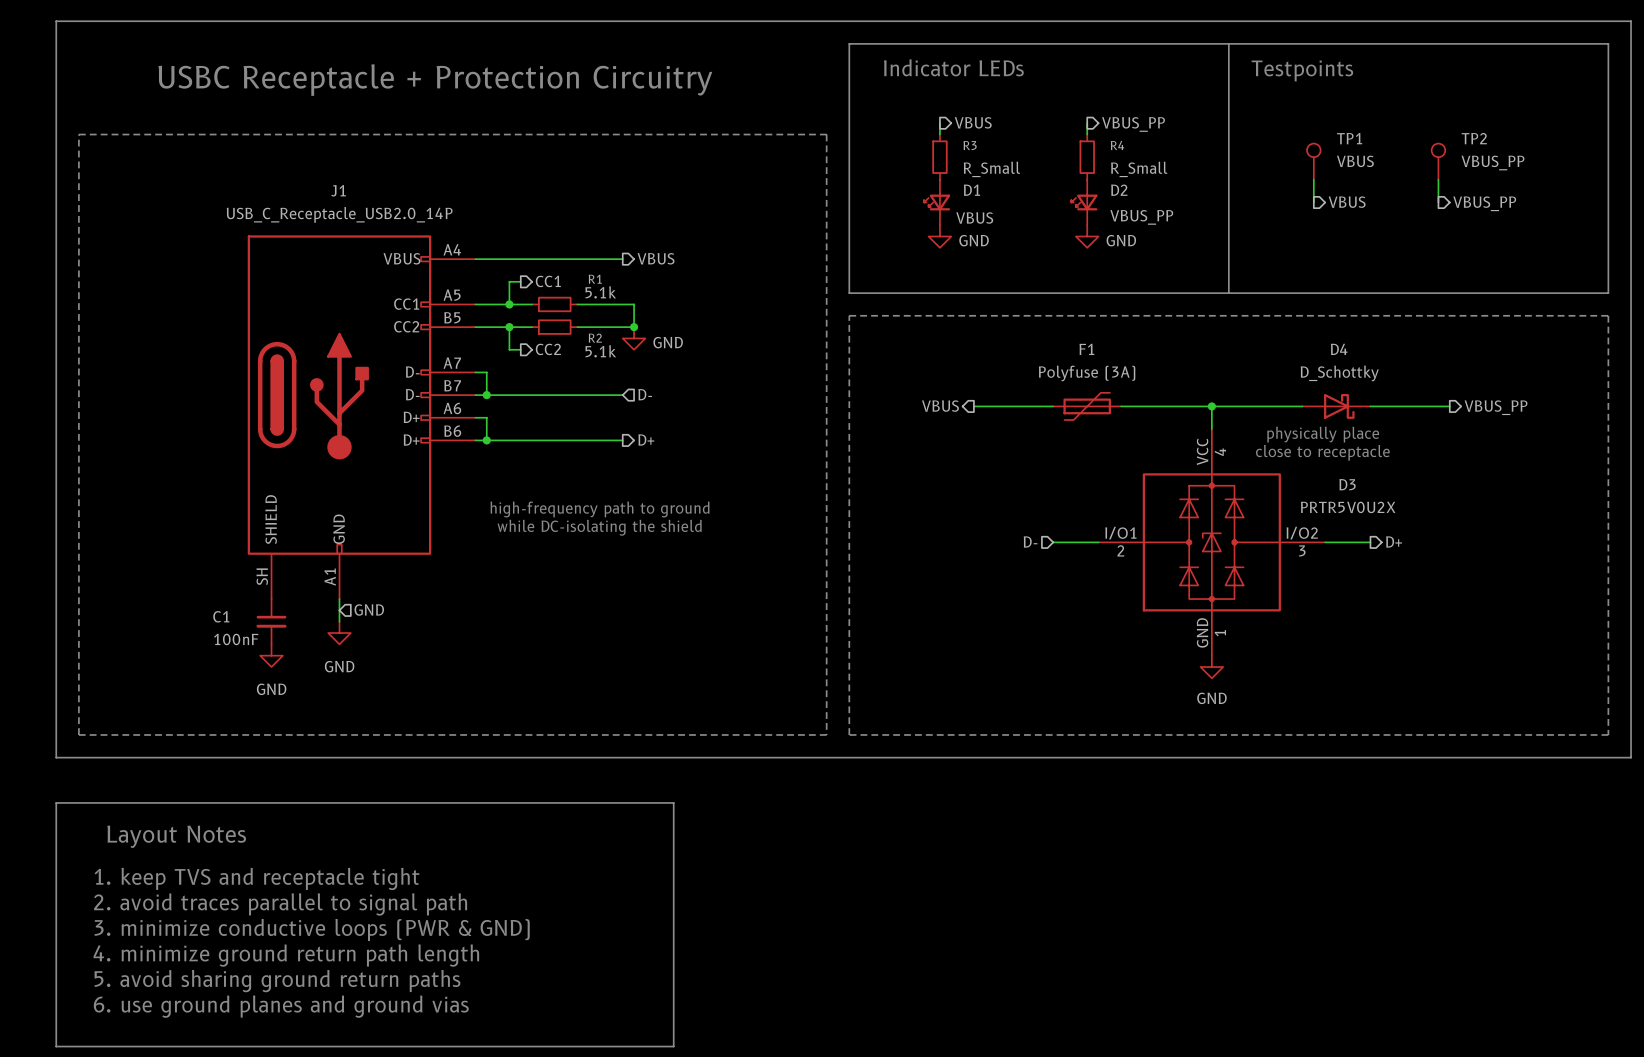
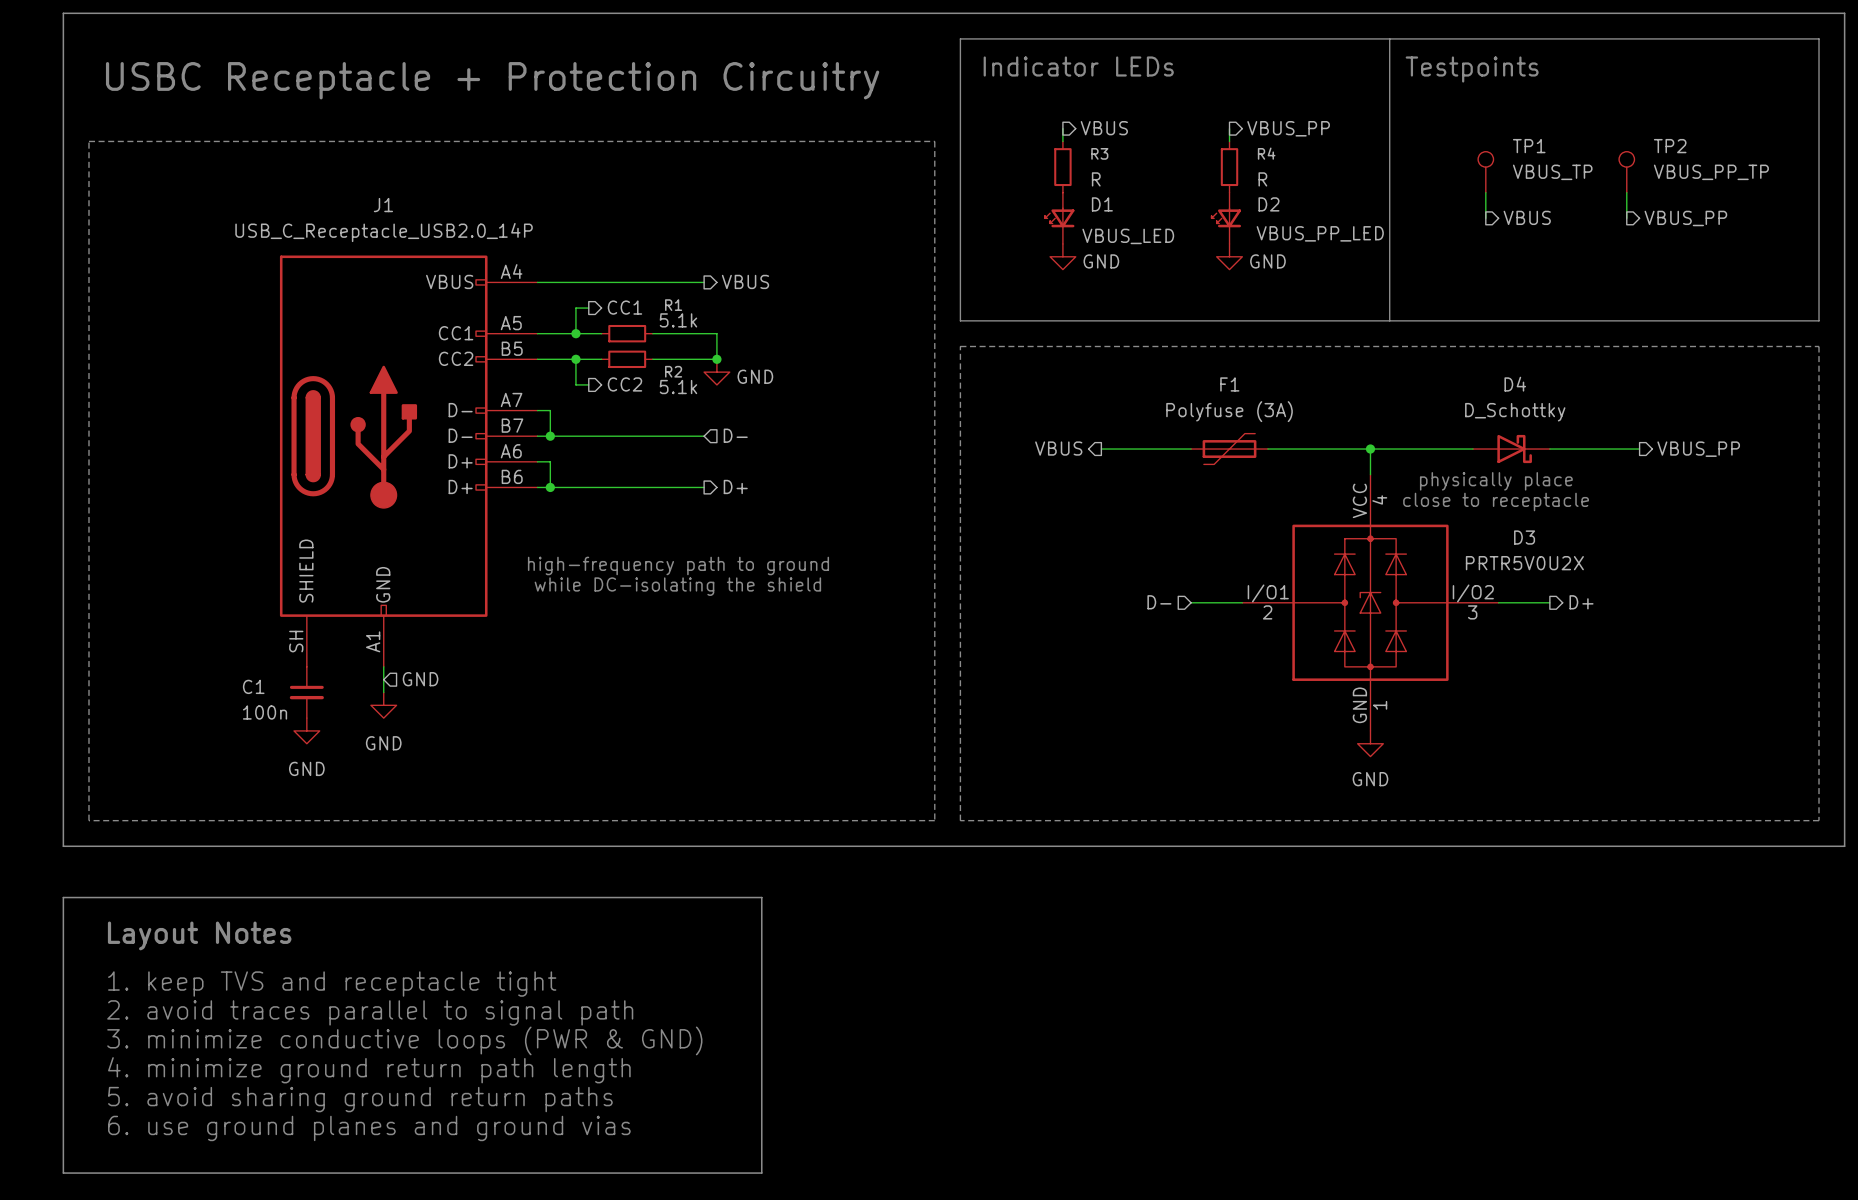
TP1 value: VBUS (1355, 161) -> VBUS_TP (1552, 172)
TP2 value: VBUS_PP (1492, 162) -> VBUS_PP_TP (1711, 172)
R3 value: R_Small (991, 169) -> R (1096, 179)
R4 value: R_Small (1139, 169) -> R (1262, 179)
D2 value: VBUS_PP (1141, 217) -> VBUS_PP_LED (1320, 233)
D1 value: VBUS (974, 218) -> VBUS_LED (1128, 236)
C1 value: 100nF (236, 639) -> 100n (265, 712)

